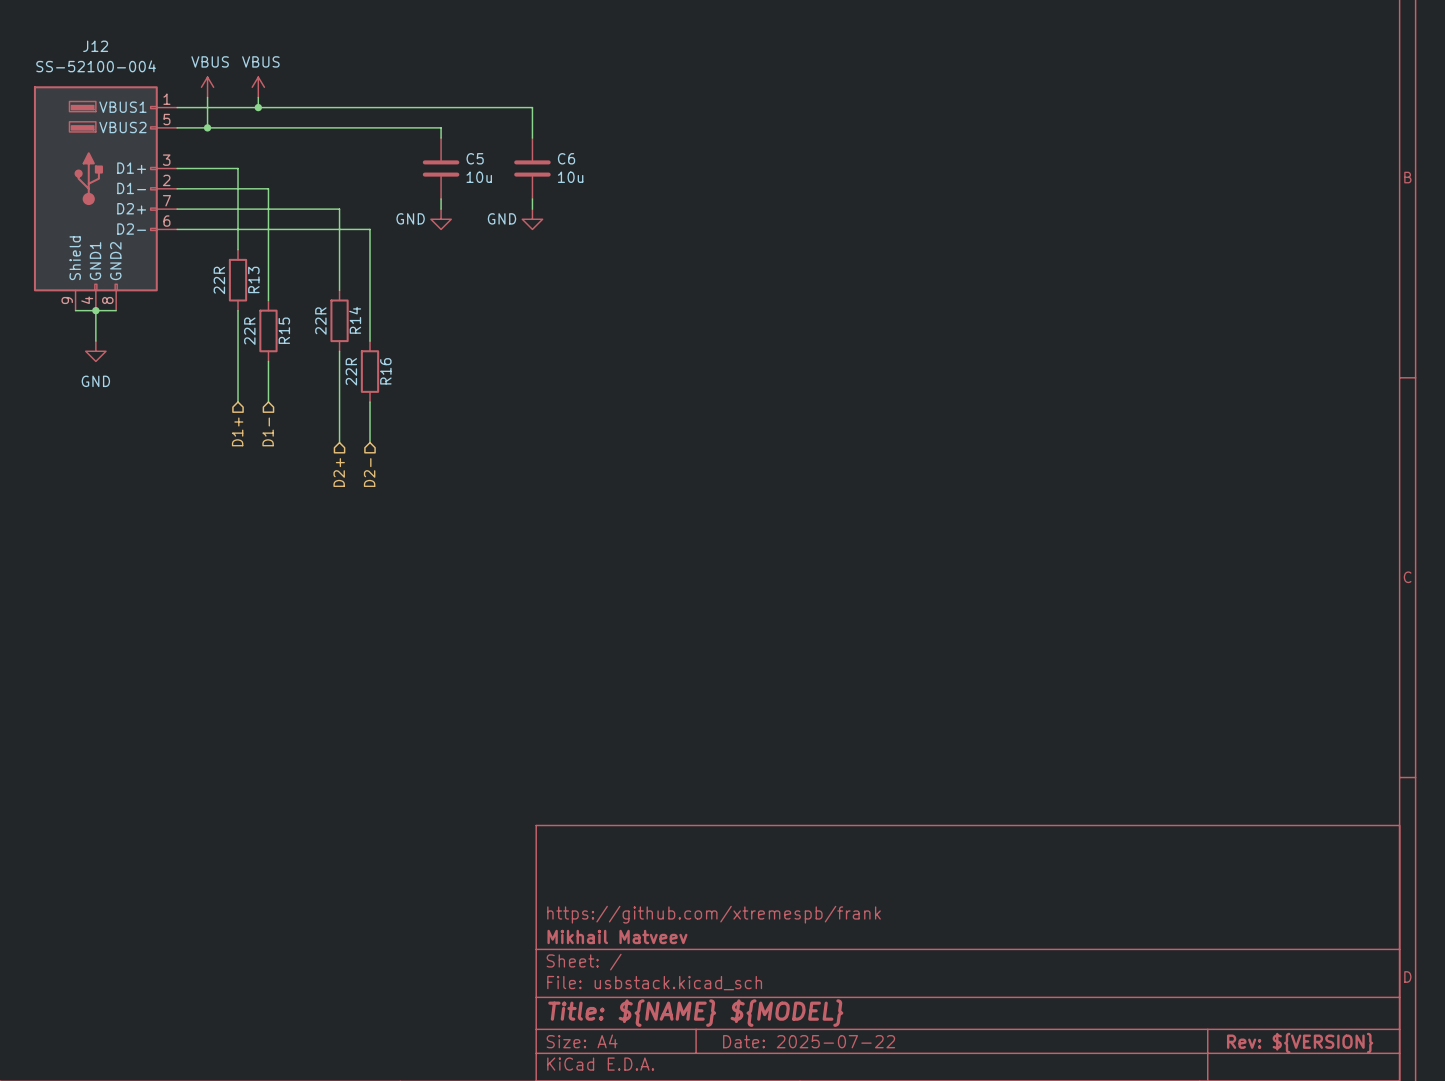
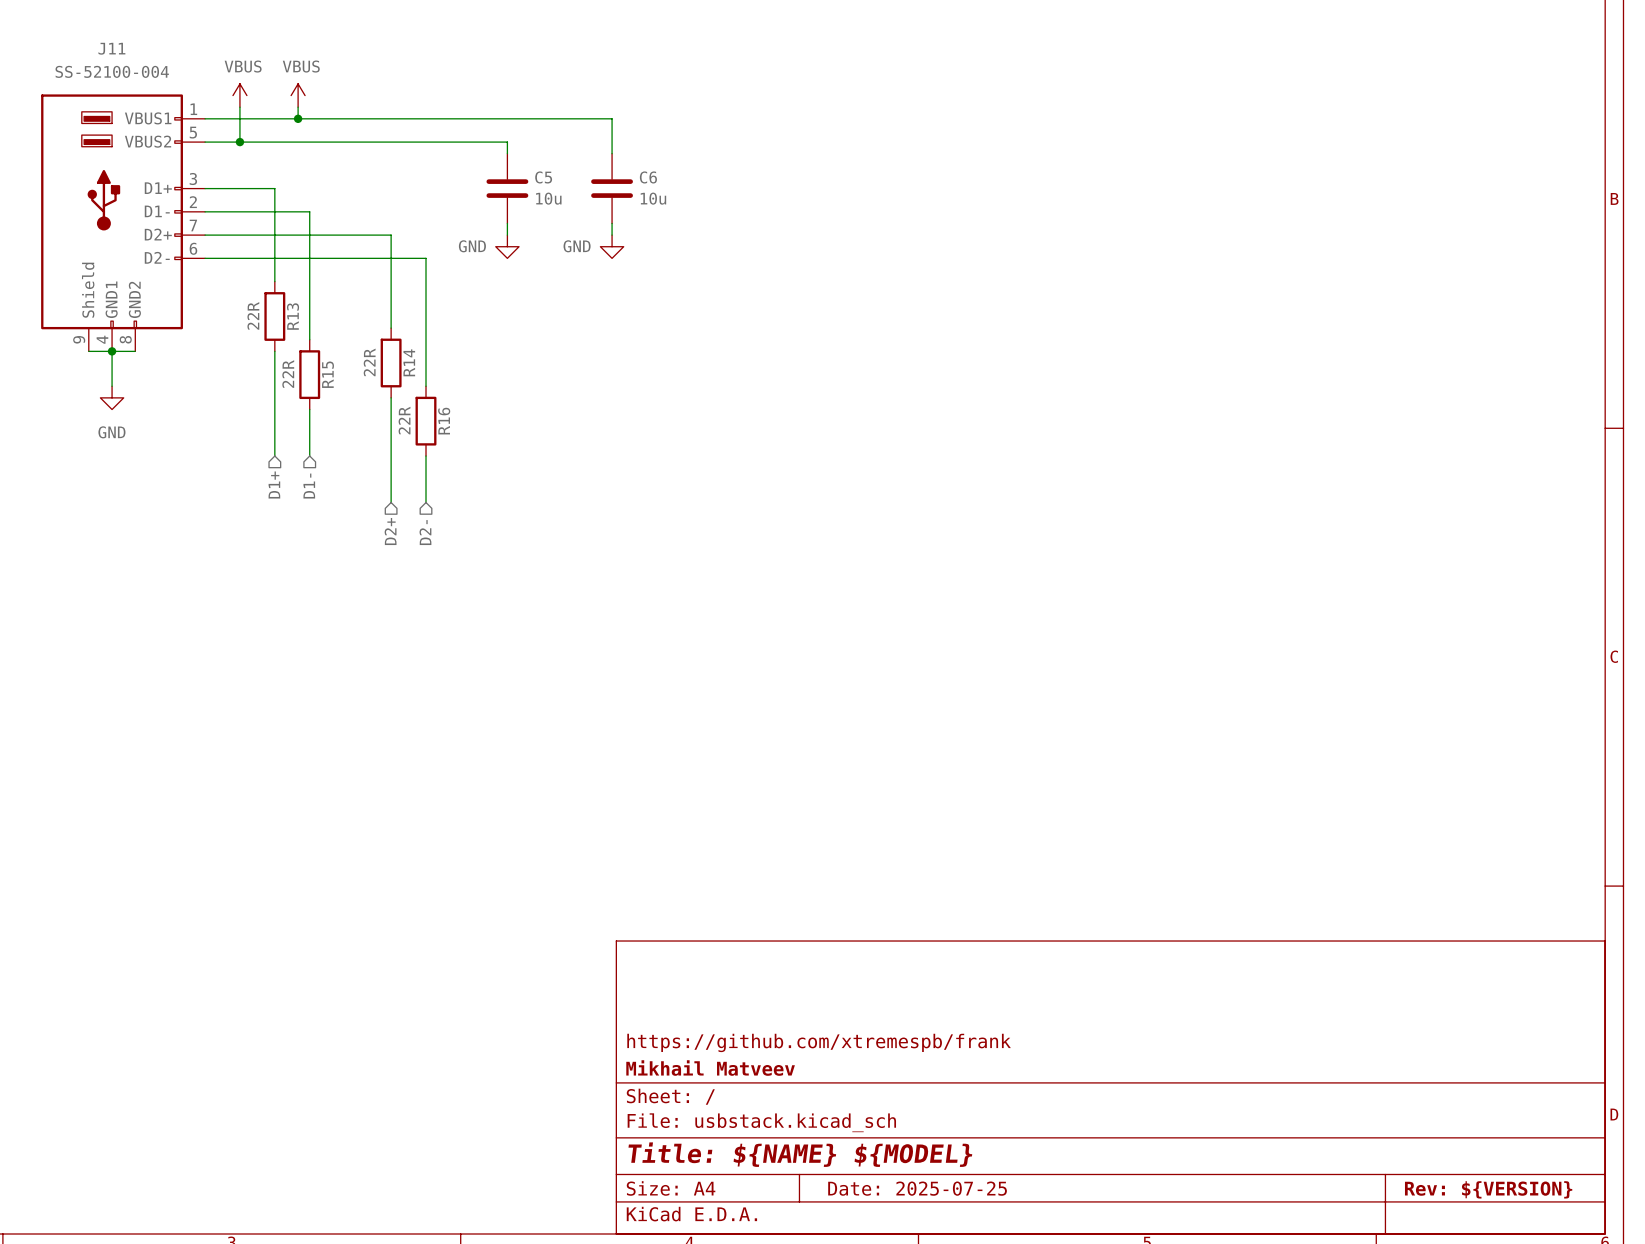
J12 name: J12 (95, 46) -> J11 (111, 48)
title block: Date: 2025-07-22 (809, 1041) -> Date: 2025-07-25 (917, 1188)

